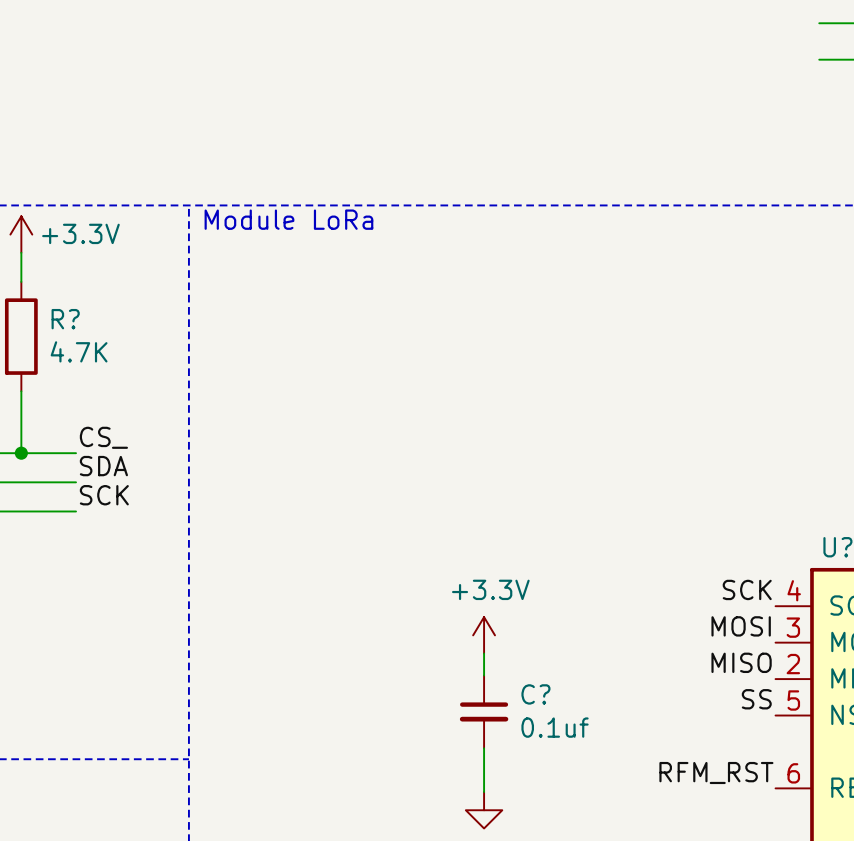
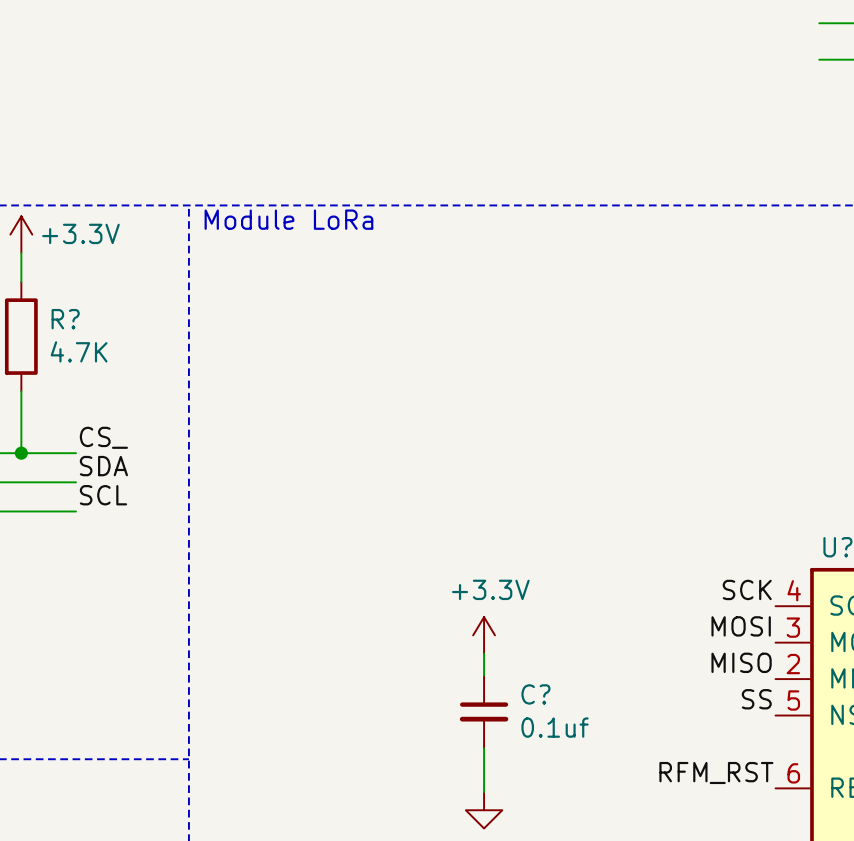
label: SCK (104, 495) -> SCL (103, 495)

